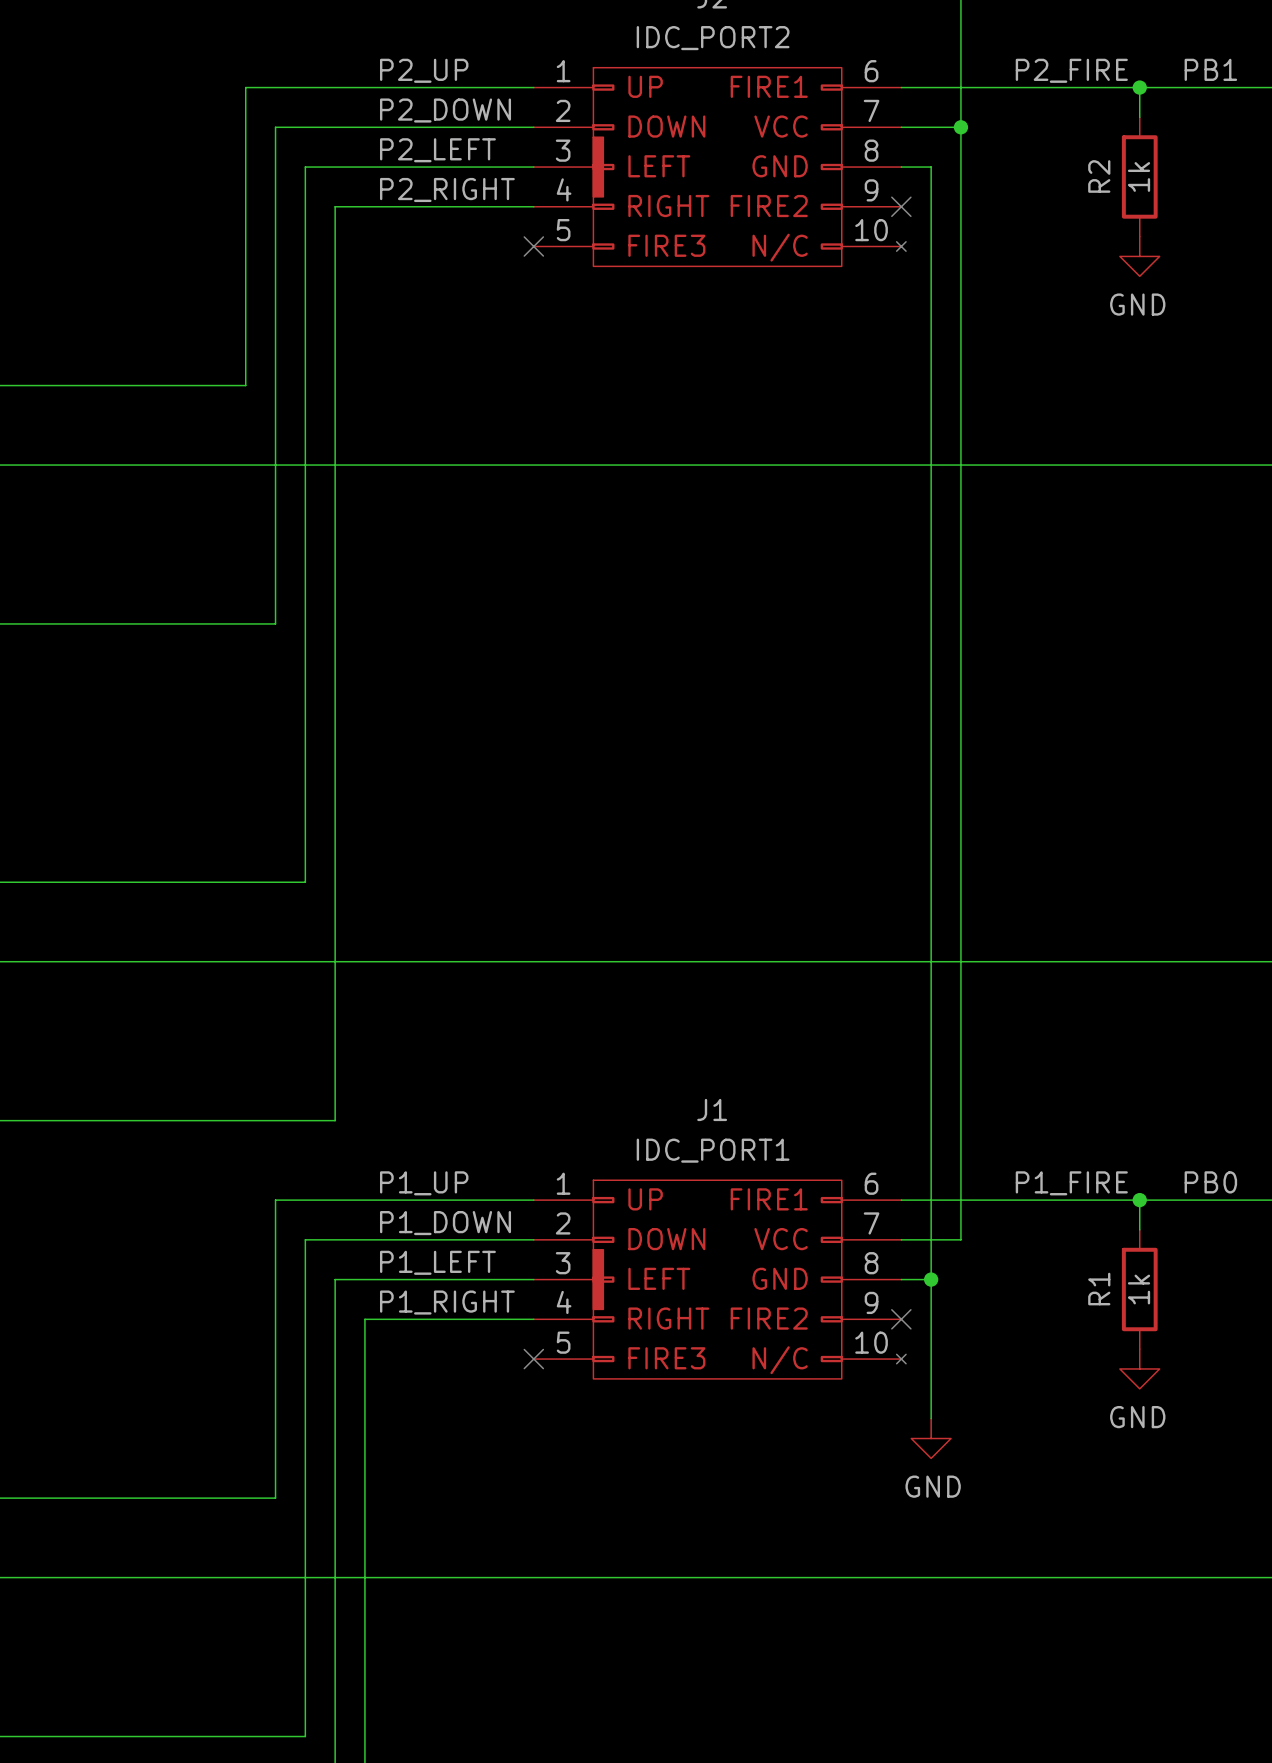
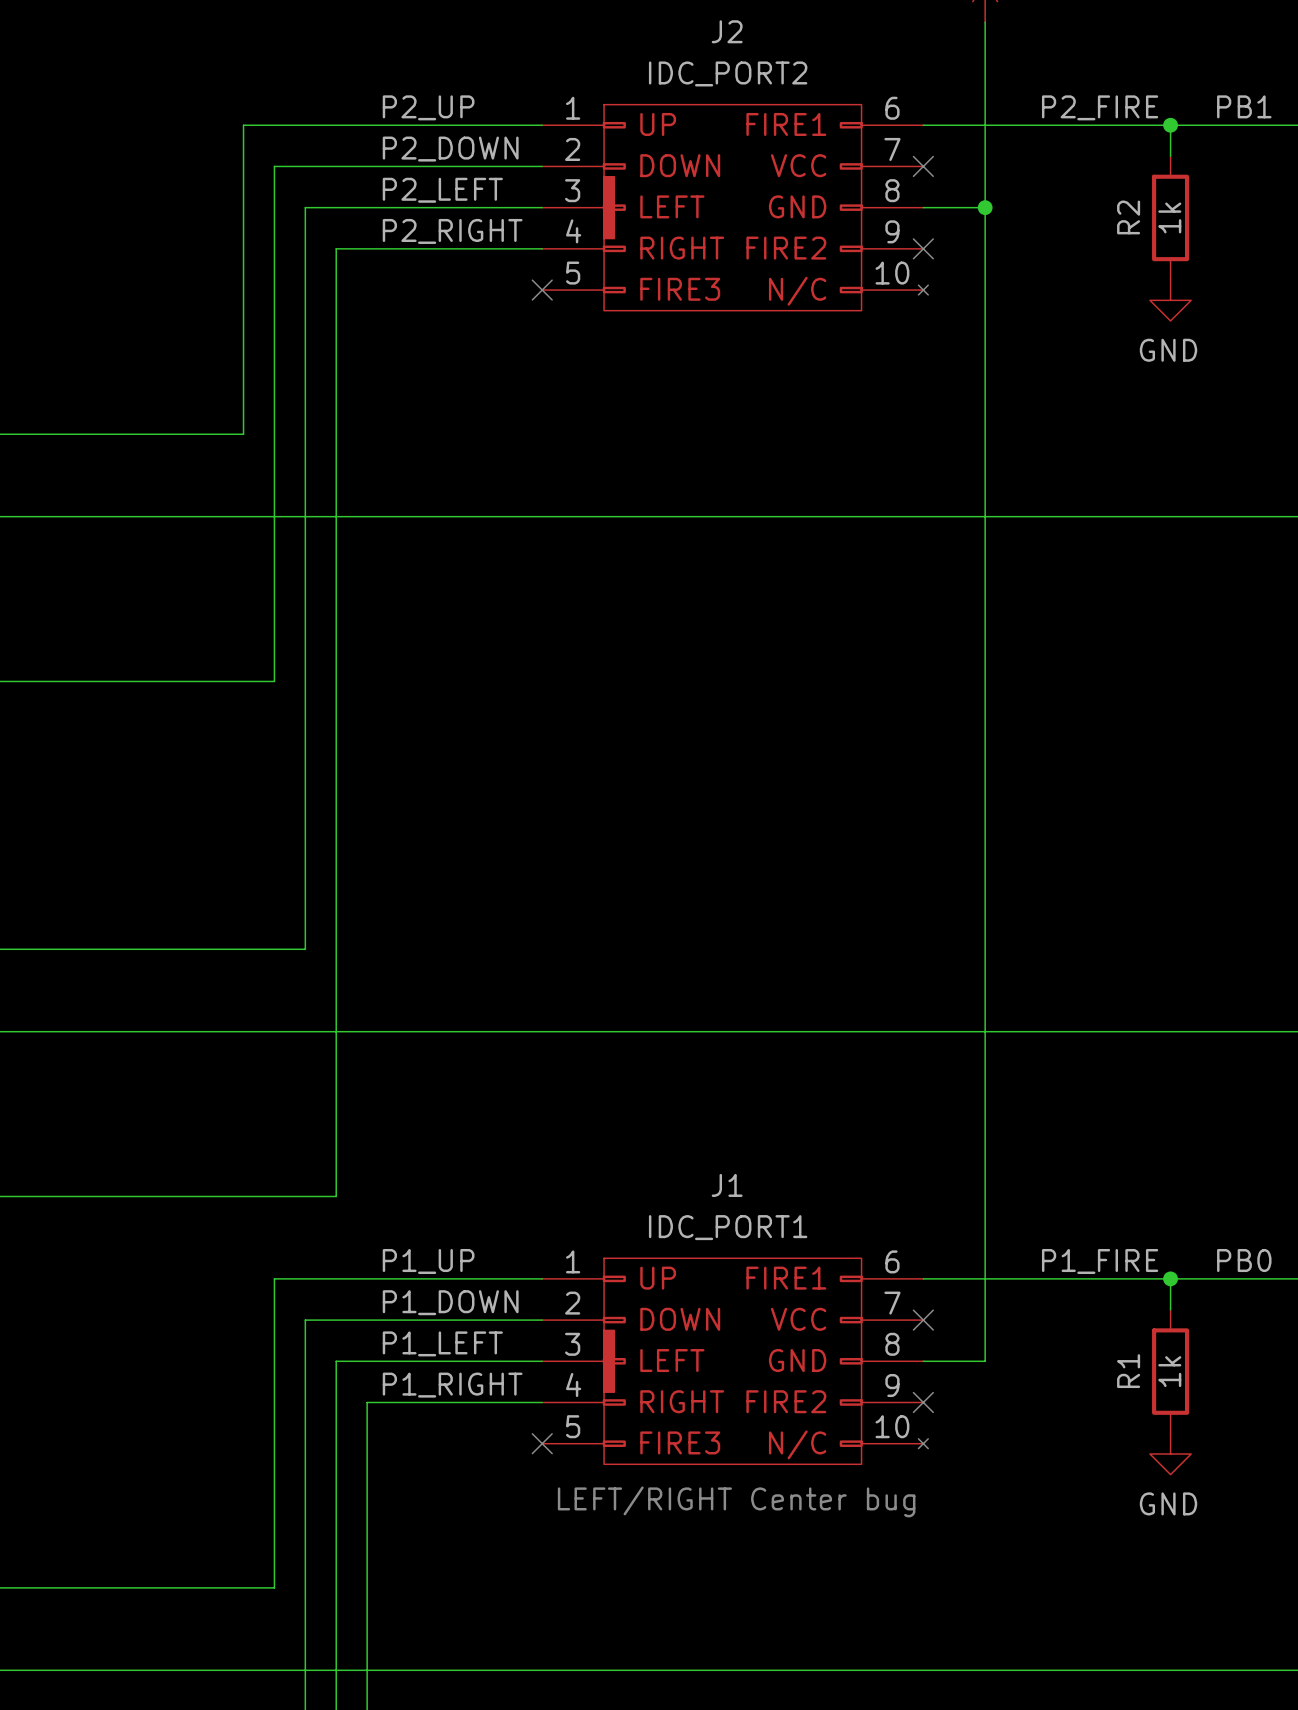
wire: (901, 127) (960, 127) -> none
no-connect mark: none -> (923, 166)
junction position: (960, 127) -> (985, 207)
wire: (931, 167) (931, 1418) -> (954, 207) (985, 207)
wire: (901, 1239) (960, 1239) -> (954, 1361) (985, 1361) (985, 1320)
no-connect mark: none -> (923, 1320)
junction: (931, 1279) -> none
text: none -> LEFT/RIGHT Center bug (736, 1501)
power symbol: GND (931, 1438) -> none

